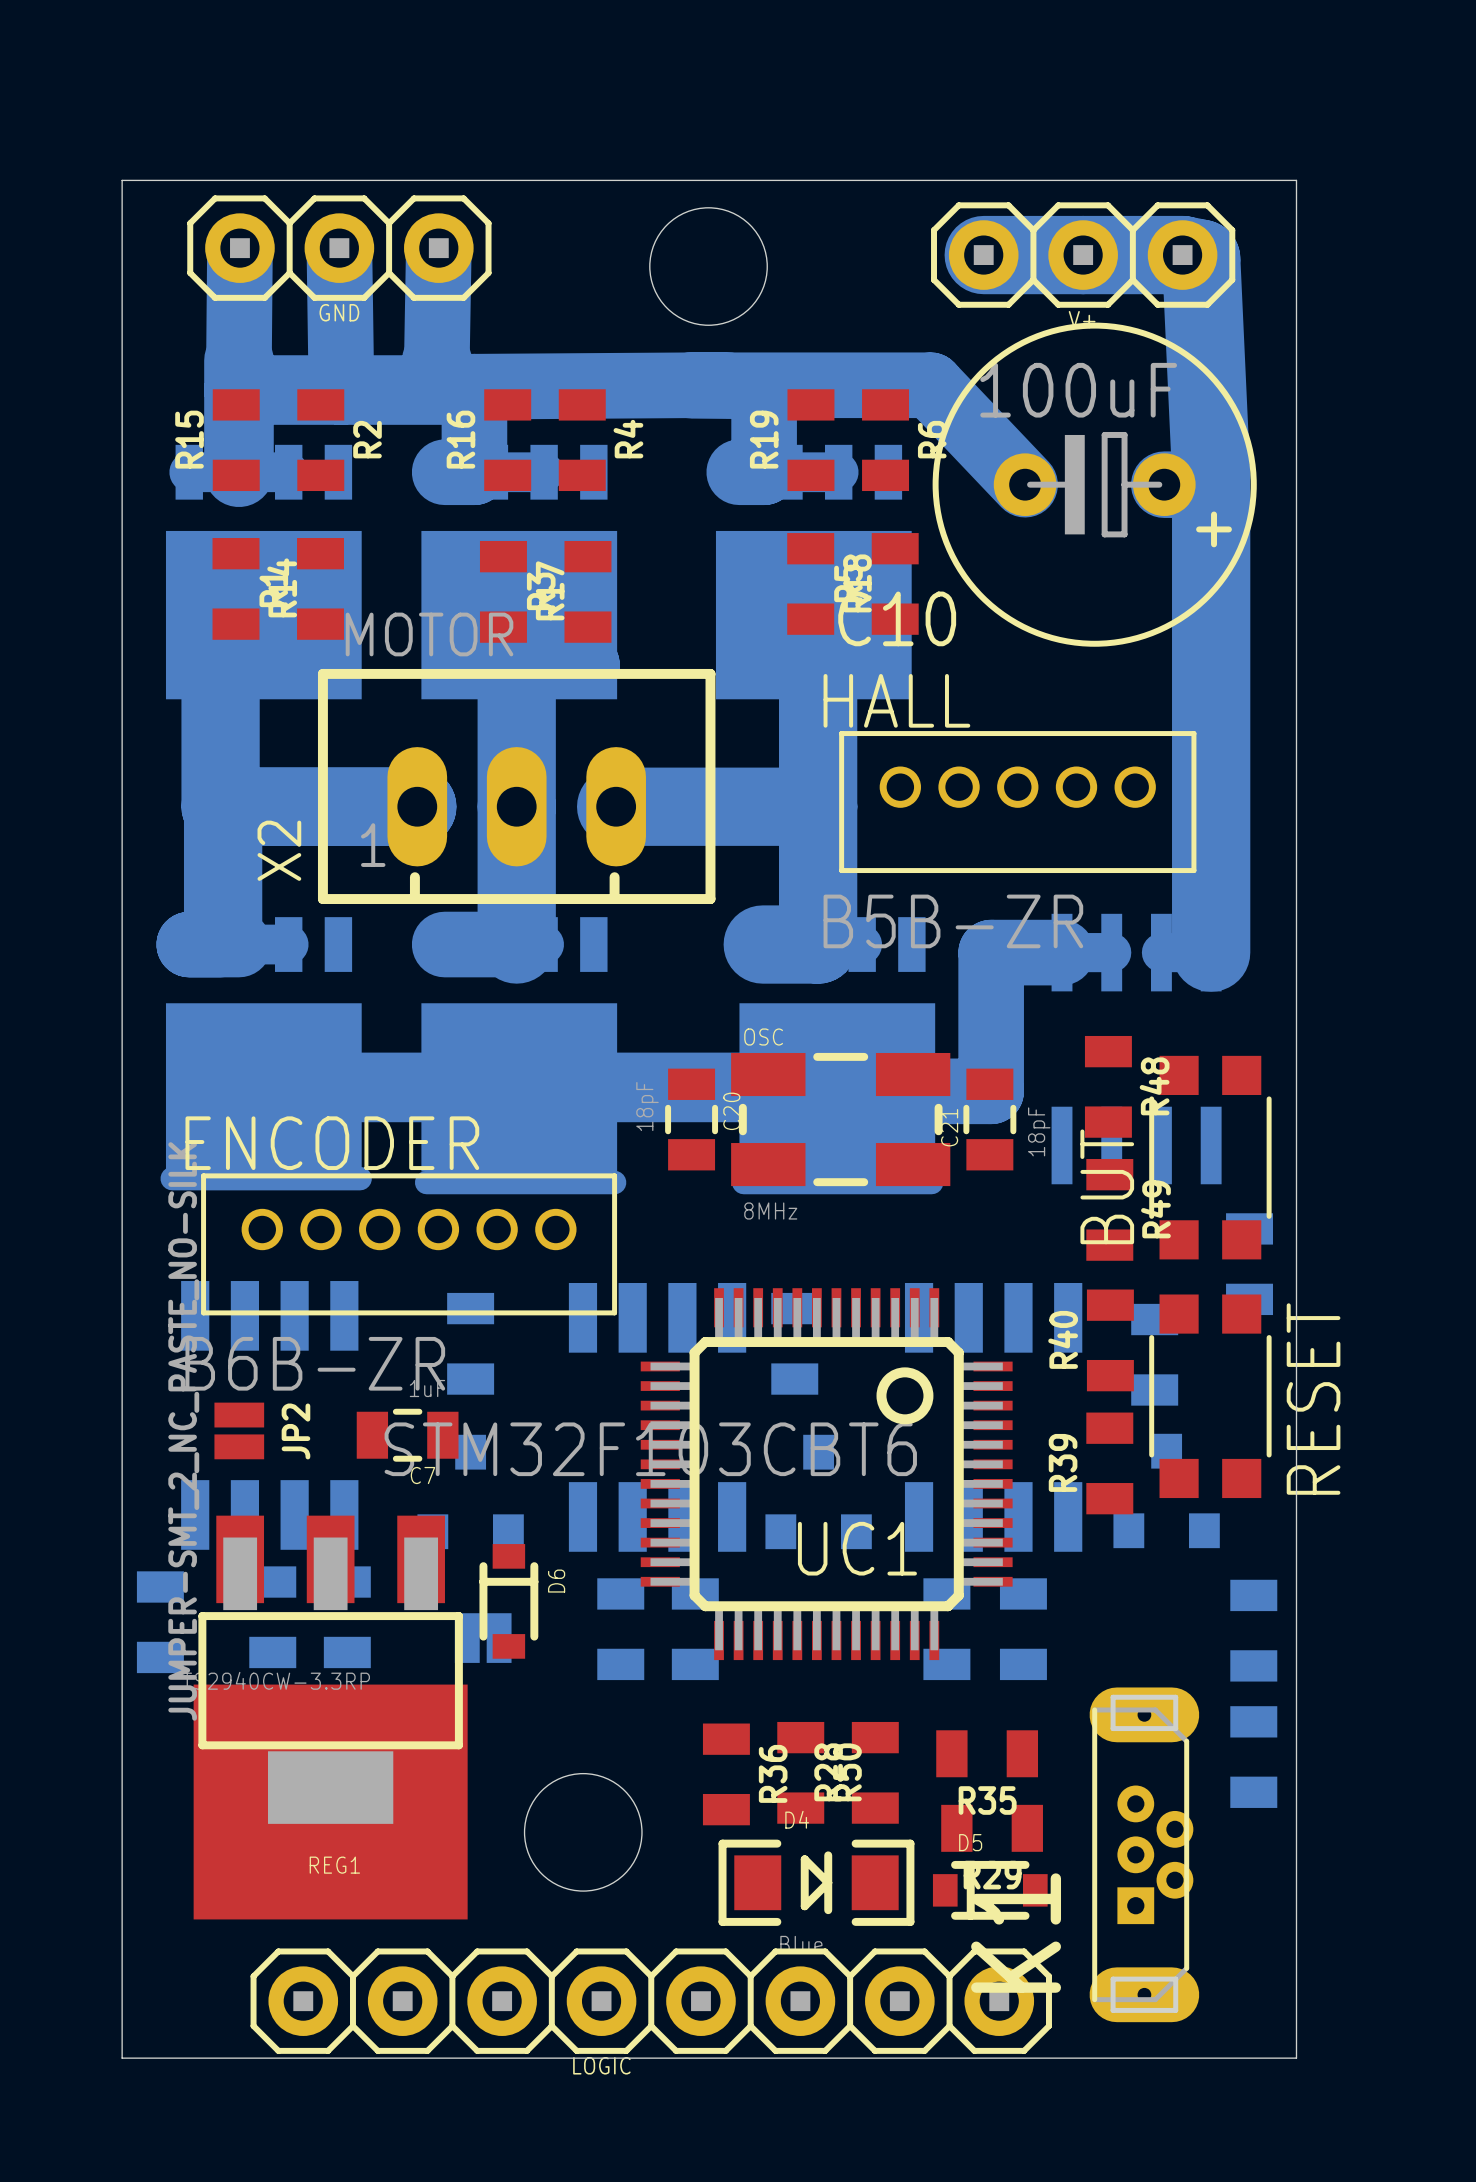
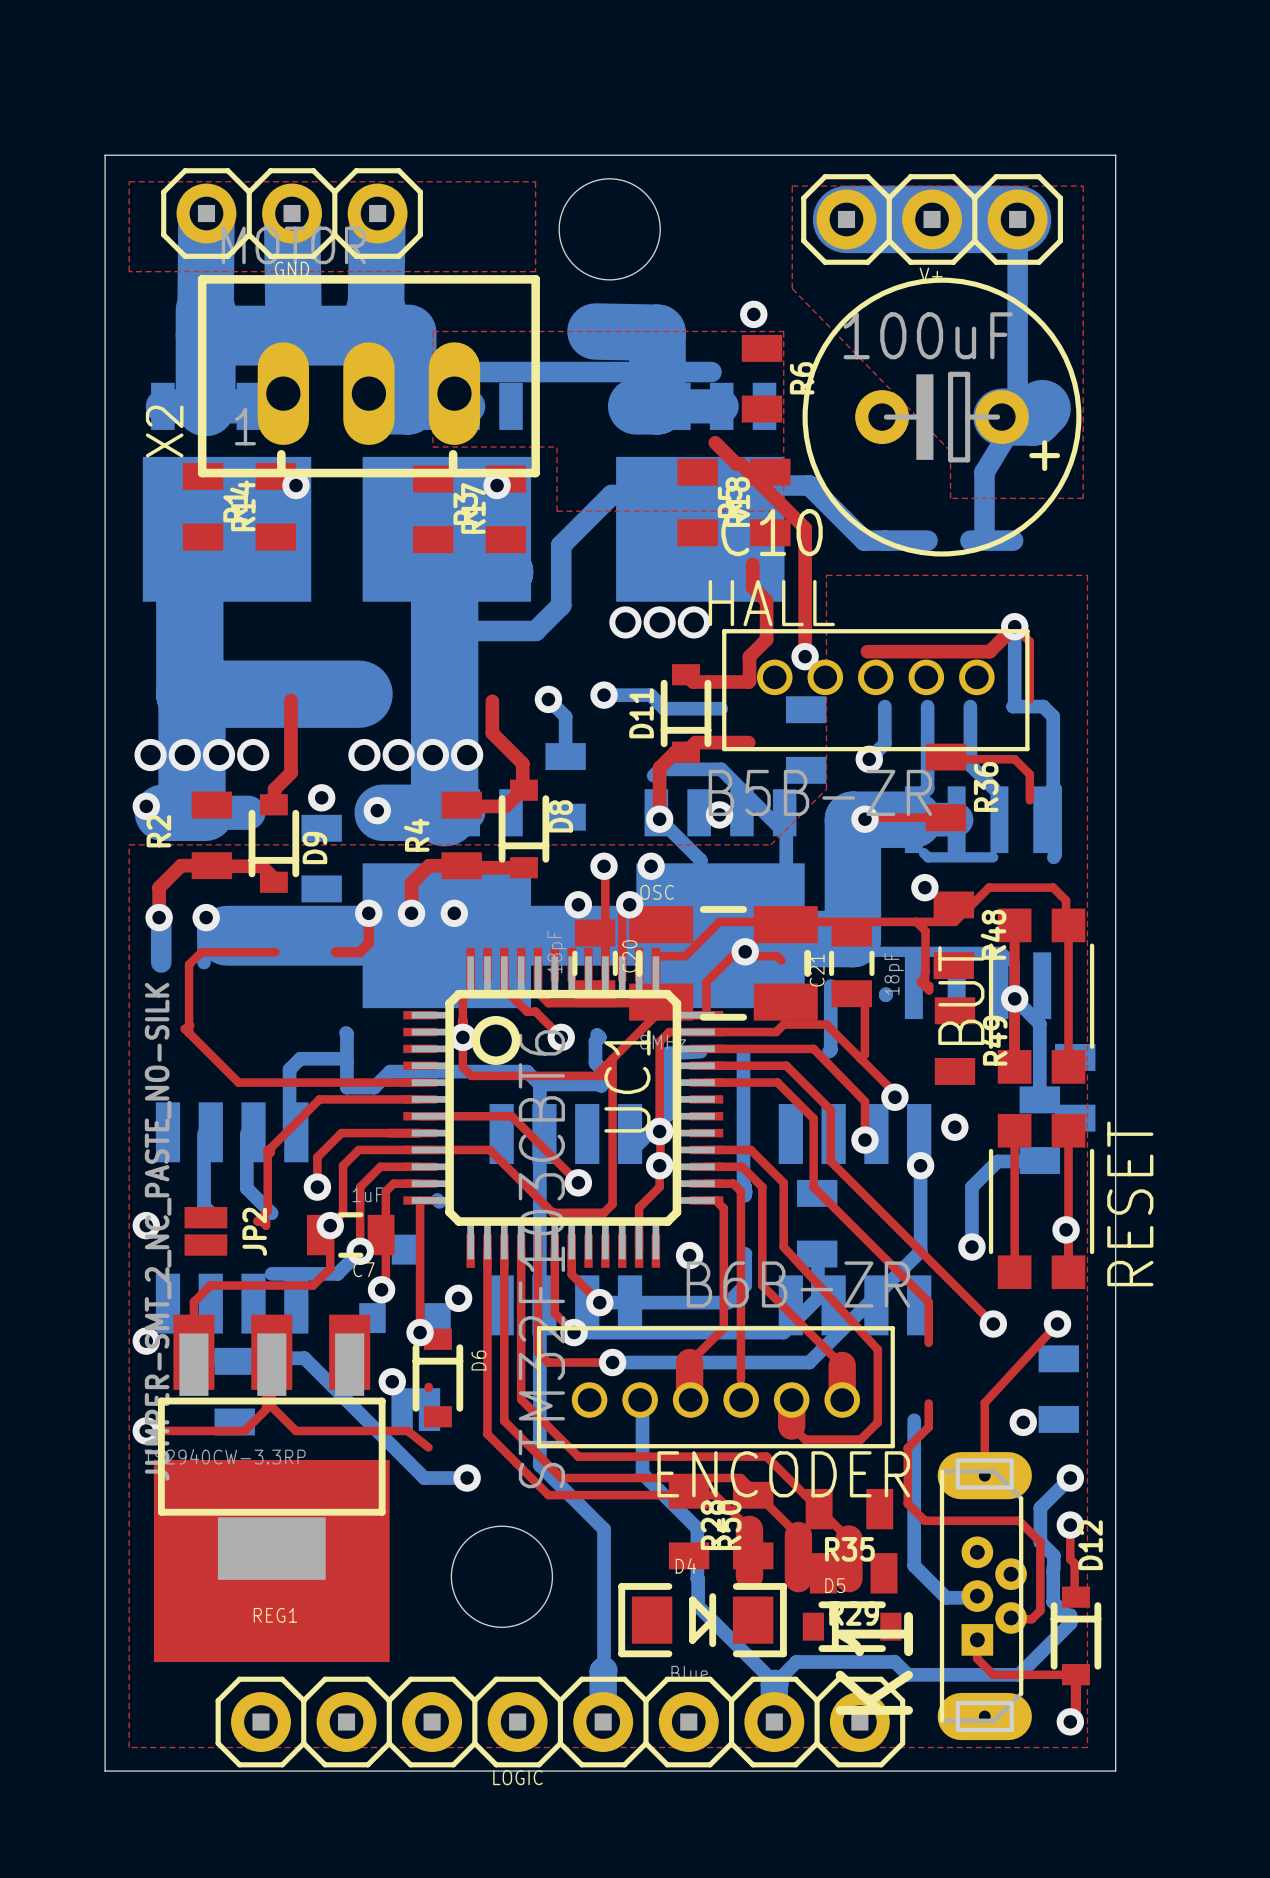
top zone outline: none -> (129, 181) (129, 271) (535, 271) (535, 181) (129, 181)
top zone outline: none -> (792, 186) (1083, 186) (1083, 498) (950, 498) (950, 451) (792, 288) (792, 186)
bottom track: (1182, 255) (1201, 258) (1211, 474) (1211, 952) (1161, 952) -> (1017, 219) (1017, 417) (984, 472) (984, 536) (989, 540)
via: none -> (753, 314)
top zone outline: none -> (432, 331) (783, 331) (783, 511) (556, 511) (556, 447) (432, 447) (432, 331)
bottom track: (444, 386) (930, 385) (1025, 484) -> none
bottom track: none -> (711, 372) (471, 372) (454, 393)
R2 name position: R2 (367, 439) -> R2 (158, 831)
R4 name position: R4 (628, 439) -> R4 (416, 835)
R15: (236, 440) -> none
R2 position: (320, 440) -> (211, 835)
R16: (507, 440) -> none
R4 position: (582, 440) -> (461, 835)
R19: (810, 440) -> none
top track: none -> (715, 442) (736, 464) (740, 464) (805, 528) (805, 656)
via: none -> (296, 485)
via: none -> (497, 485)
bottom track: none -> (927, 540) (864, 540) (809, 485) (699, 485) (690, 494) (611, 494) (561, 545) (561, 605) (535, 630) (454, 630) (437, 648) (432, 648) (432, 652)
bottom track: none -> (970, 540) (1013, 540)
bottom track: (818, 642) (818, 944) (762, 944) (812, 944) (817, 944) (862, 944) -> none
top track: none -> (752, 564) (752, 587) (766, 601) (766, 639) (749, 656) (749, 681) (693, 681) (686, 674)
top zone outline: none -> (826, 575) (826, 789) (770, 844) (129, 844) (129, 1747) (1087, 1747) (1087, 575) (826, 575)
via: none -> (625, 622)
via: none -> (659, 622)
via: none -> (693, 622)
bottom track: none -> (1014, 626) (1014, 705) (1013, 706) (1043, 706) (1053, 716) (1053, 787) (1055, 789) (1053, 857)
via: none -> (1014, 626)
top track: none -> (867, 651) (989, 651) (1014, 626) (1029, 641) (1029, 699)
via: none -> (805, 656)
X2 position: (516, 786) -> (368, 376)
bottom track: (616, 806) (818, 806) -> none
bottom track: none -> (604, 695) (650, 695) (664, 708) (721, 708)
via: none -> (604, 695)
bottom track: none -> (548, 699) (565, 716) (565, 756)
via: none -> (548, 699)
top track: none -> (290, 700) (290, 772) (274, 789) (274, 802) (278, 806)
top track: none -> (492, 701) (492, 733) (522, 763) (523, 790) (505, 806) (461, 805)
bottom track: none -> (884, 706) (884, 743) (869, 759)
bottom track: none -> (927, 706) (927, 788) (923, 792)
bottom track: none -> (970, 706) (970, 765) (994, 789)
D11: none -> (686, 713)
part: none -> (806, 740)
top track: none -> (748, 742) (695, 742) (686, 752) (675, 752) (659, 767) (659, 819)
via: none -> (150, 755)
via: none -> (184, 755)
via: none -> (219, 755)
via: none -> (253, 755)
via: none -> (364, 755)
via: none -> (398, 755)
via: none -> (432, 755)
via: none -> (467, 755)
top track: none -> (945, 757) (948, 759) (1014, 759) (1029, 774) (1029, 800)
via: none -> (869, 759)
bottom track: none -> (653, 775) (660, 769) (721, 769) (786, 834) (786, 880)
part: none -> (565, 786)
via: none -> (321, 797)
via: none -> (146, 806)
via: none -> (377, 810)
via: none -> (719, 814)
top track: none -> (945, 817) (864, 819)
bottom track: none -> (659, 819) (700, 860) (700, 880)
via: none -> (659, 819)
via: none -> (864, 819)
D8: none -> (523, 828)
D9: none -> (273, 843)
bottom track: none -> (923, 853) (928, 857) (993, 857)
part: none -> (321, 858)
top track: none -> (604, 866) (605, 964)
via: none -> (604, 866)
via: none -> (651, 866)
top track: none -> (523, 867) (429, 865) (411, 883) (411, 913)
top track: none -> (273, 882) (273, 878) (261, 866) (214, 866) (214, 861) (213, 865) (181, 865) (159, 887) (159, 917)
via: none -> (924, 887)
part: (263, 1044) -> none
via: none -> (578, 904)
top track: none -> (629, 904) (622, 912) (622, 964)
via: none -> (629, 904)
via: none -> (368, 913)
top track: none -> (373, 913) (368, 913) (368, 943) (359, 952) (336, 952)
via: none -> (411, 913)
via: none -> (454, 913)
bottom track: none -> (159, 917) (161, 919) (161, 962)
via: none -> (159, 917)
bottom track: none -> (206, 917) (204, 928) (204, 962)
via: none -> (206, 917)
top track: none -> (916, 921) (925, 931) (924, 973) (925, 986) (925, 986) (929, 990) (929, 986) (924, 986) (920, 981)
top track: none -> (1014, 925) (1014, 1066)
top track: none -> (275, 952) (201, 952) (189, 964) (189, 1033)
bottom track: none -> (745, 951) (1001, 951) (1014, 964) (1014, 998) (1039, 1023) (1039, 1099)
via: none -> (745, 951)
top track: none -> (781, 960) (777, 956) (749, 956) (745, 951) (736, 951) (706, 982) (706, 1015) (656, 1015) (595, 1075)
top track: none -> (470, 964) (470, 991) (462, 998) (462, 1067) (471, 1075) (612, 1075) (608, 1071)
top track: none -> (504, 964) (504, 989) (527, 1011) (535, 1011) (565, 1041)
top track: none -> (538, 964) (538, 992) (548, 1003) (646, 1003) (655, 994) (655, 959) (659, 956) (685, 956) (719, 921) (954, 921) (989, 887) (1053, 887) (1066, 900) (1066, 922) (1068, 925) (1068, 1066)
bottom track: none -> (830, 986) (830, 1049) (829, 1051)
top track: none -> (864, 986) (864, 1054) (860, 1058)
bottom track: none -> (885, 994) (886, 994)
via: none -> (1014, 998)
bottom track: (172, 1178) (360, 1178) -> none
bottom track: (426, 1182) (614, 1182) -> none
bottom track: (743, 1182) (931, 1182) -> none
BUT name position: BUT (1107, 1186) -> BUT (961, 995)
top track: none -> (190, 1025) (184, 1028) (238, 1082) (420, 1082)
bottom track: none -> (346, 1032) (346, 1087) (374, 1087) (390, 1071) (527, 1071) (539, 1084)
bottom track: none -> (597, 1034) (599, 1037) (595, 1041) (595, 1063) (601, 1068) (601, 1085) (539, 1084)
via: none -> (462, 1037)
via: none -> (561, 1037)
top track: none -> (706, 1048) (813, 1048) (864, 1101) (864, 1140)
bottom track: none -> (700, 1051) (668, 1053) (668, 1114) (636, 1146)
bottom track: none -> (743, 1051) (743, 1185) (745, 1195)
top track: none -> (612, 1058) (612, 1204) (604, 1212) (552, 1212) (489, 1149) (358, 1149) (343, 1165) (343, 1212) (330, 1225) (330, 1268) (313, 1285) (210, 1285) (193, 1302) (193, 1352)
bottom track: none -> (346, 1062) (343, 1058) (300, 1058) (289, 1069) (289, 1133)
top track: none -> (706, 1065) (786, 1065) (830, 1110) (830, 1161) (993, 1324)
ENCODER rotation: 0° (409, 1244) -> 180° (715, 1387)
ENCODER position: (409, 1244) -> (715, 1387)
top track: none -> (706, 1082) (777, 1082) (813, 1118) (813, 1187) (928, 1302) (928, 1342)
bottom track: none -> (539, 1084) (539, 1465) (604, 1529) (603, 1722)
top track: none -> (894, 1097) (894, 1093) (826, 1024) (783, 1024) (776, 1032) (669, 1032) (659, 1041) (659, 1135)
via: none -> (894, 1097)
top track: none -> (420, 1099) (319, 1099) (270, 1148) (270, 1152) (267, 1150)
top track: none -> (420, 1116) (511, 1116) (578, 1182)
via: none -> (954, 1127)
top track: none -> (659, 1131) (659, 1187) (639, 1207) (639, 1251)
via: none -> (659, 1131)
top track: none -> (1014, 1130) (1014, 1272) (1010, 1276)
top track: none -> (1068, 1130) (1068, 1272)
top track: none -> (420, 1133) (341, 1133) (317, 1157) (317, 1187)
bottom track: none -> (204, 1133) (204, 1206) (210, 1212) (206, 1212) (207, 1213)
bottom track: none -> (246, 1133) (246, 1188) (271, 1213)
via: none -> (864, 1140)
top track: none -> (267, 1150) (267, 1211) (257, 1221) (261, 1221) (266, 1225) (266, 1221) (265, 1223)
top track: none -> (706, 1149) (750, 1149) (783, 1182) (783, 1247) (877, 1349) (877, 1422) (860, 1439) (805, 1439) (791, 1426) (791, 1400)
R40 side: top (1110, 1340) -> bottom (1039, 1130)
part: (470, 1343) -> none
part: (794, 1343) -> none
bottom track: none -> (1039, 1160) (997, 1161) (971, 1187) (971, 1247)
via: none -> (659, 1165)
bottom track: none -> (920, 1165) (920, 1251) (809, 1362) (612, 1362)
via: none -> (920, 1165)
part: (1154, 1354) -> none
top track: none -> (420, 1166) (380, 1166) (360, 1187) (360, 1251)
top track: none -> (706, 1166) (742, 1166) (762, 1187) (762, 1285) (842, 1365) (842, 1400)
via: none -> (578, 1182)
top track: none -> (420, 1183) (393, 1183) (385, 1191) (385, 1285) (381, 1289)
top track: none -> (706, 1183) (733, 1183) (740, 1191) (740, 1379)
via: none -> (317, 1187)
bottom track: none -> (437, 1199) (439, 1201)
top track: none -> (420, 1200) (420, 1332)
top track: none -> (706, 1200) (715, 1200) (723, 1208) (723, 1328) (689, 1362) (690, 1400)
part: none -> (817, 1223)
via: none -> (146, 1225)
via: none -> (330, 1225)
via: none -> (1066, 1229)
via: none -> (971, 1247)
top track: none -> (487, 1251) (487, 1434) (548, 1495) (715, 1495) (749, 1529) (749, 1580) (745, 1580)
top track: none -> (504, 1251) (504, 1421) (561, 1478) (740, 1478) (798, 1535) (798, 1578)
top track: none -> (521, 1251) (521, 1399) (578, 1456) (766, 1456) (848, 1538) (848, 1578)
top track: none -> (538, 1251) (538, 1352) (548, 1362) (612, 1362)
top track: none -> (554, 1251) (554, 1313) (574, 1332)
top track: none -> (571, 1251) (571, 1274) (599, 1302)
bottom track: none -> (360, 1251) (337, 1273) (271, 1273)
via: none -> (360, 1251)
bottom track: none -> (745, 1254) (745, 1285) (728, 1302) (599, 1302)
bottom track: none -> (817, 1254) (817, 1298) (783, 1332) (574, 1332)
via: none -> (689, 1255)
R39: (1109, 1463) -> none
UC1 rotation: 0° (826, 1474) -> 90° counterclockwise (563, 1107)
UC1 position: (826, 1474) -> (563, 1107)
part: (1166, 1490) -> none
part: (818, 1491) -> none
via: none -> (381, 1289)
via: none -> (458, 1298)
via: none -> (599, 1302)
via: none -> (993, 1324)
top track: none -> (1057, 1324) (984, 1402) (984, 1475)
via: none -> (1057, 1324)
via: none -> (420, 1332)
via: none -> (574, 1332)
via: none -> (146, 1341)
bottom track: none -> (197, 1362) (206, 1361) (209, 1358) (304, 1358) (424, 1478) (467, 1478)
via: none -> (612, 1362)
via: none -> (392, 1381)
top track: none -> (428, 1386) (428, 1388)
part: (347, 1617) -> none
part: (160, 1622) -> none
bottom track: none -> (640, 1400) (642, 1402) (642, 1473) (697, 1528) (698, 1606) (774, 1684)
part: (620, 1629) -> none
part: (695, 1629) -> none
part: (946, 1629) -> none
part: (1023, 1629) -> none
top track: none -> (928, 1403) (928, 1427) (907, 1448) (907, 1503) (924, 1520) (1019, 1520) (1040, 1542) (1040, 1610) (1031, 1619) (1010, 1619)
part position: (1253, 1630) -> (1058, 1389)
bottom track: none -> (914, 1420) (914, 1565) (946, 1597) (975, 1597) (977, 1596)
via: none -> (1023, 1422)
top track: none -> (146, 1430) (244, 1430) (266, 1409) (266, 1357) (271, 1352) (271, 1406) (296, 1430) (407, 1430) (428, 1447)
via: none -> (146, 1430)
REG1 position: (330, 1717) -> (271, 1488)
via: none -> (467, 1478)
bottom track: none -> (1070, 1478) (1040, 1507) (1040, 1542) (1053, 1555) (1053, 1572)
via: none -> (1070, 1478)
part: (1253, 1757) -> none
top track: none -> (1070, 1525) (1070, 1559) (1074, 1563) (1075, 1597)
via: none -> (1070, 1525)
R36 position: (726, 1774) -> (945, 787)
bottom track: none -> (1053, 1567) (1053, 1602) (1066, 1615) (1070, 1615) (1070, 1623) (1019, 1674) (907, 1674) (894, 1661) (796, 1661) (775, 1683)
D12: none -> (1075, 1635)
top track: none -> (977, 1639) (977, 1658) (993, 1674) (1075, 1674) (1075, 1720) (1070, 1721)
via: none -> (1070, 1721)

